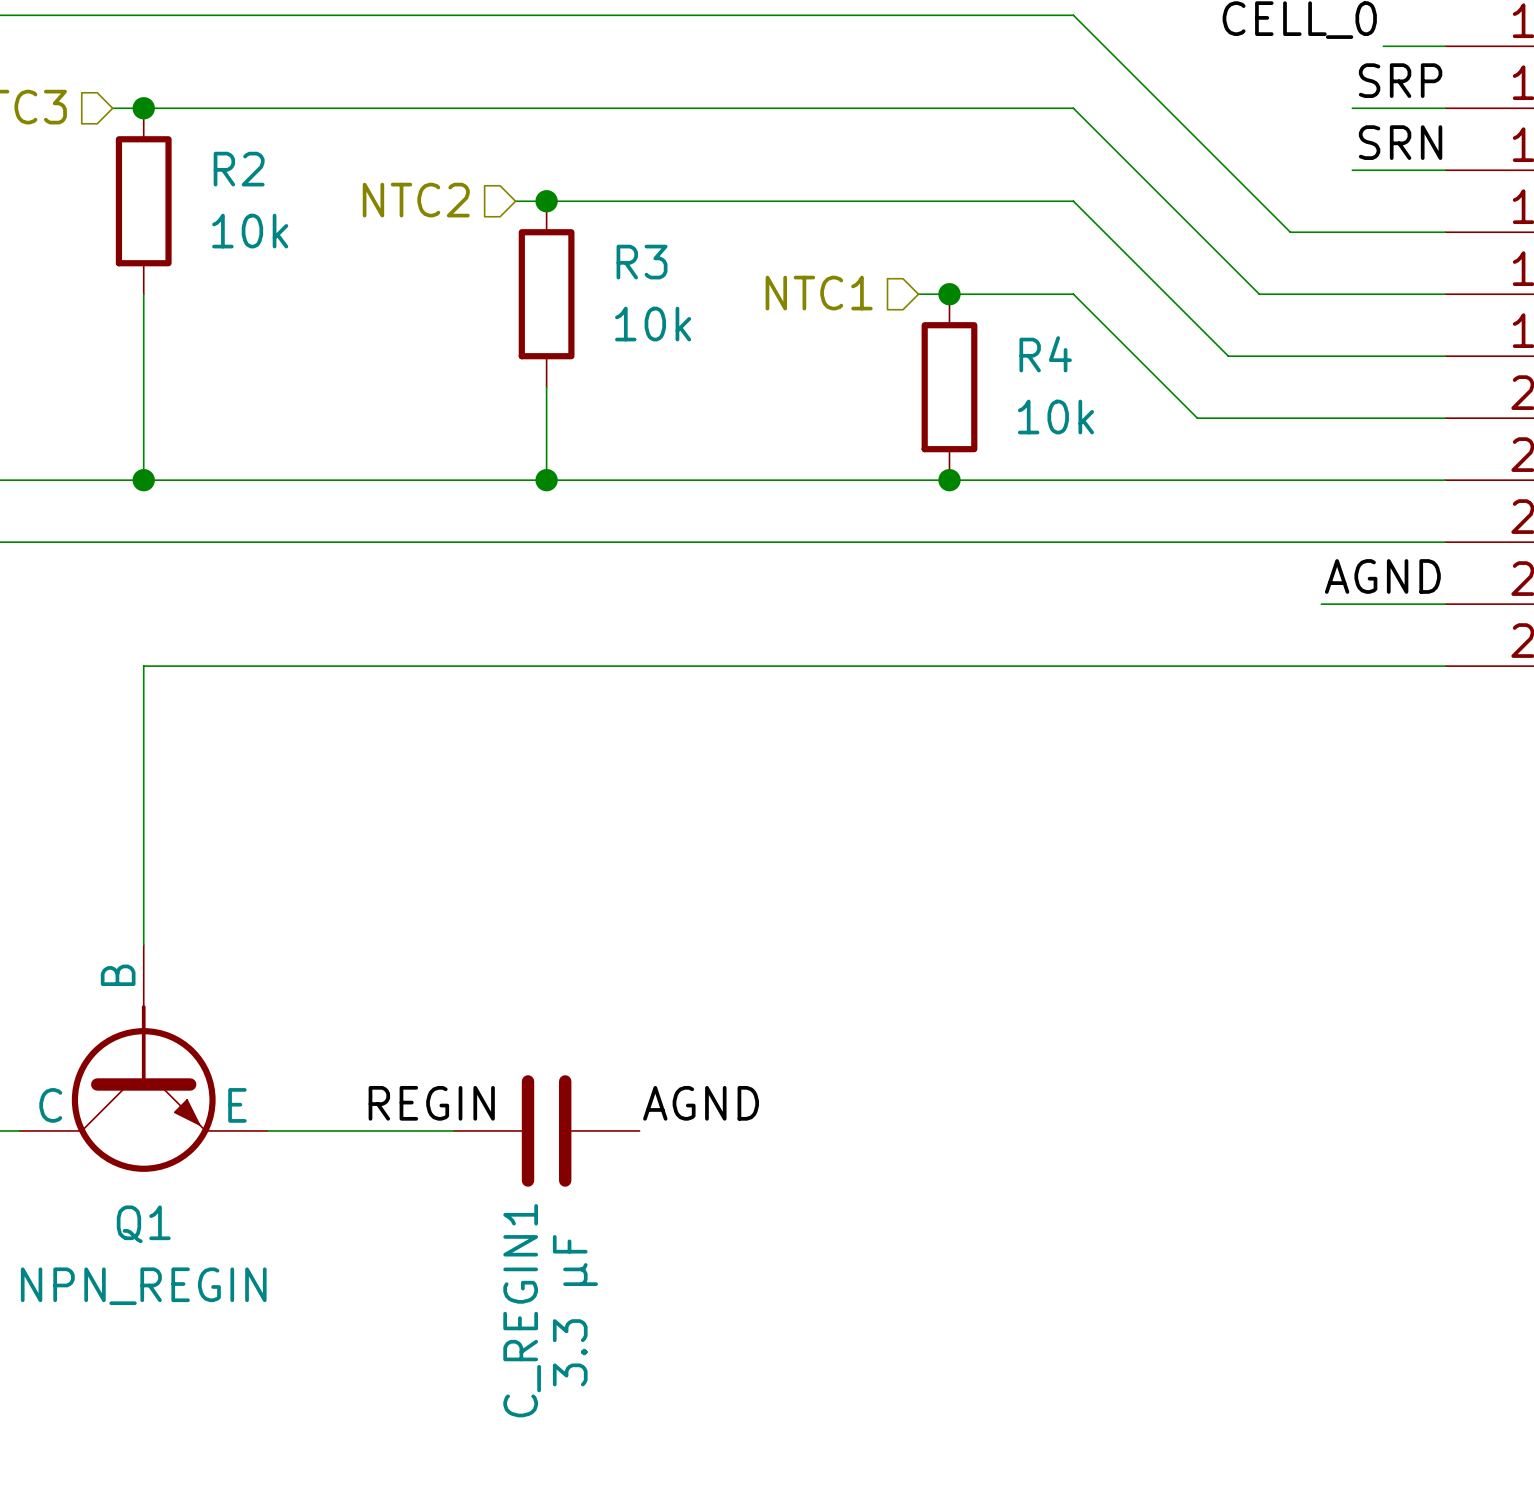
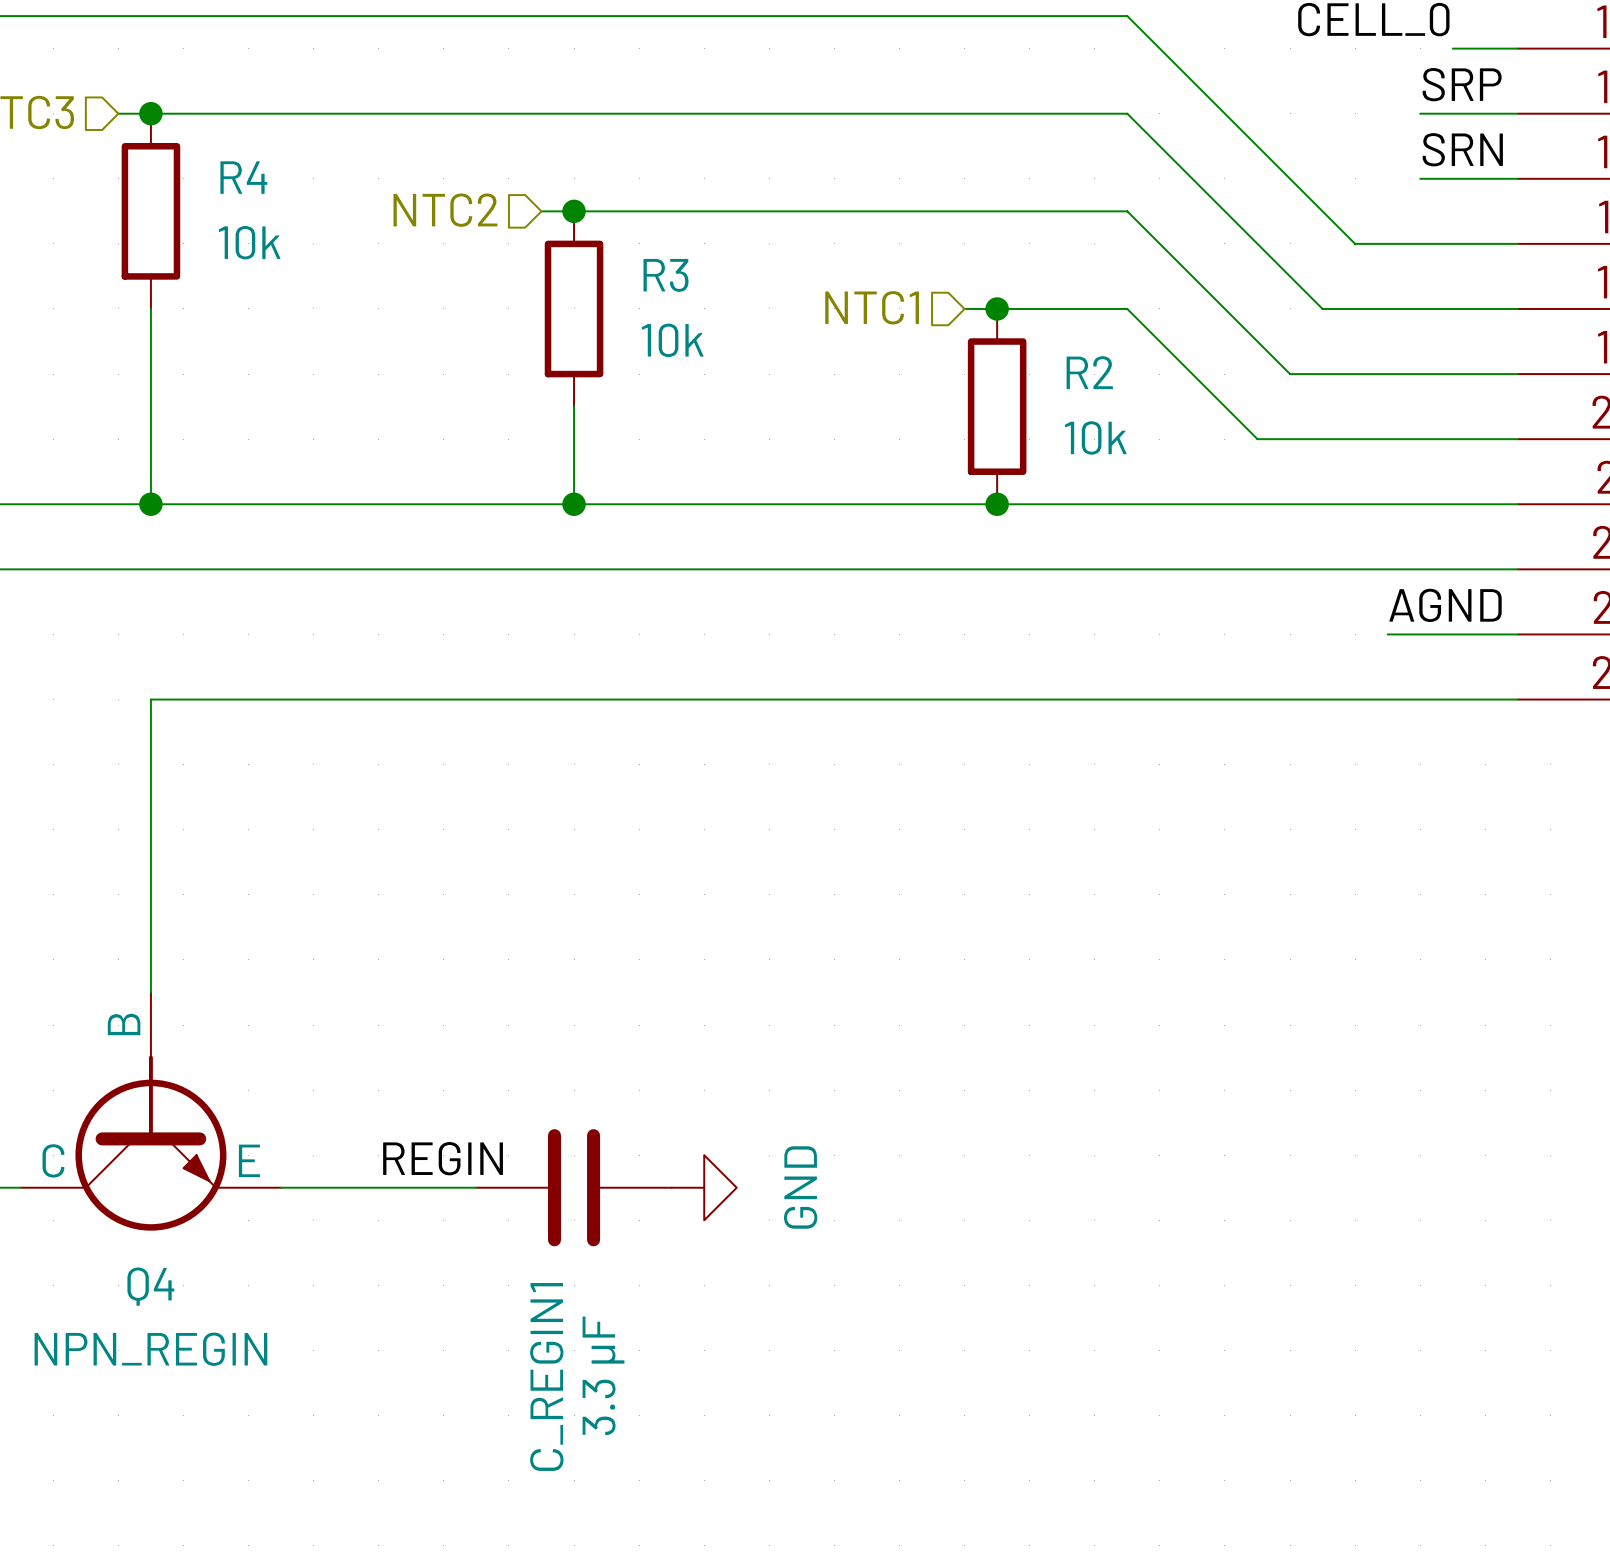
R2 name: R2 (239, 169) -> R4 (243, 177)
R4 name: R4 (1045, 354) -> R2 (1089, 372)
label: AGND (701, 1103) -> none
power symbol: none -> GND (704, 1187)
Q1 name: Q1 (143, 1224) -> Q4 (150, 1286)

